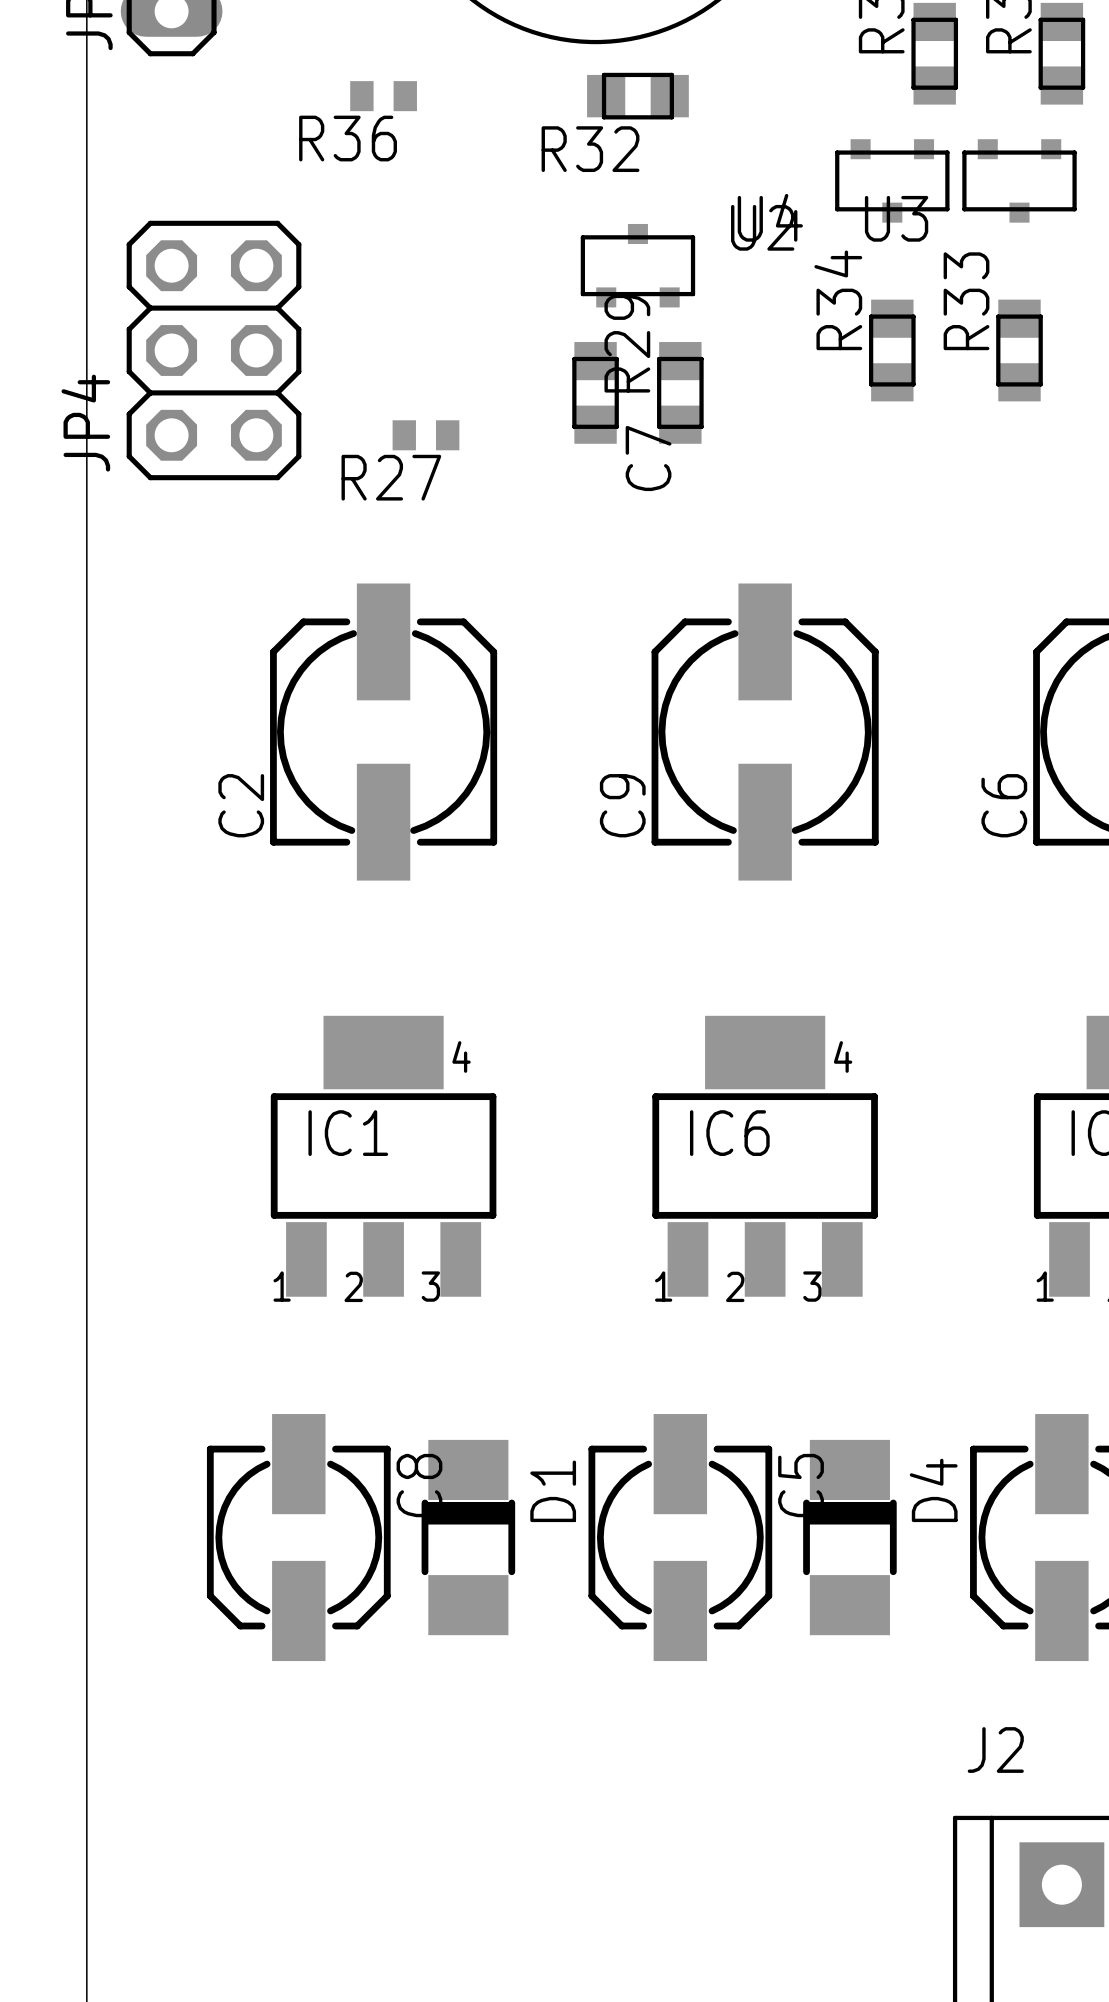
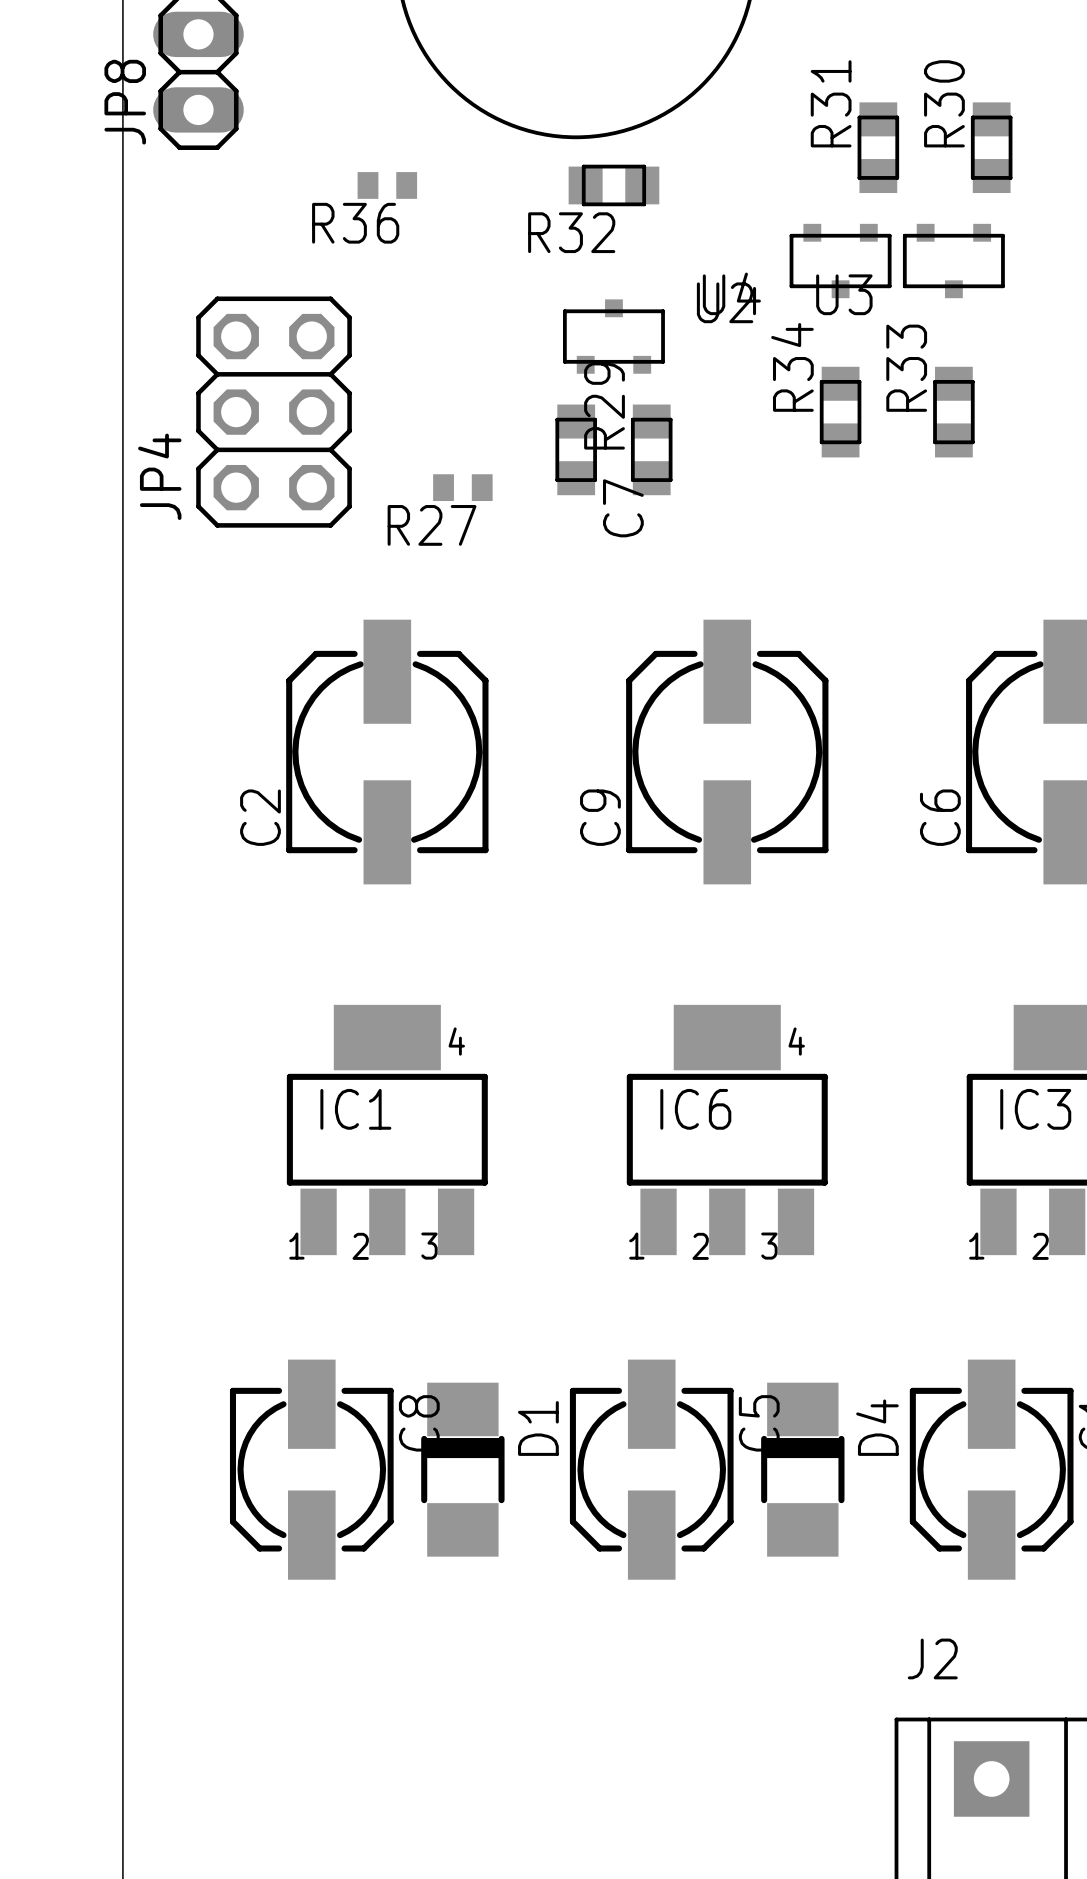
JP4 position: (214, 350) -> (274, 412)
R27 position: (425, 435) -> (462, 487)

